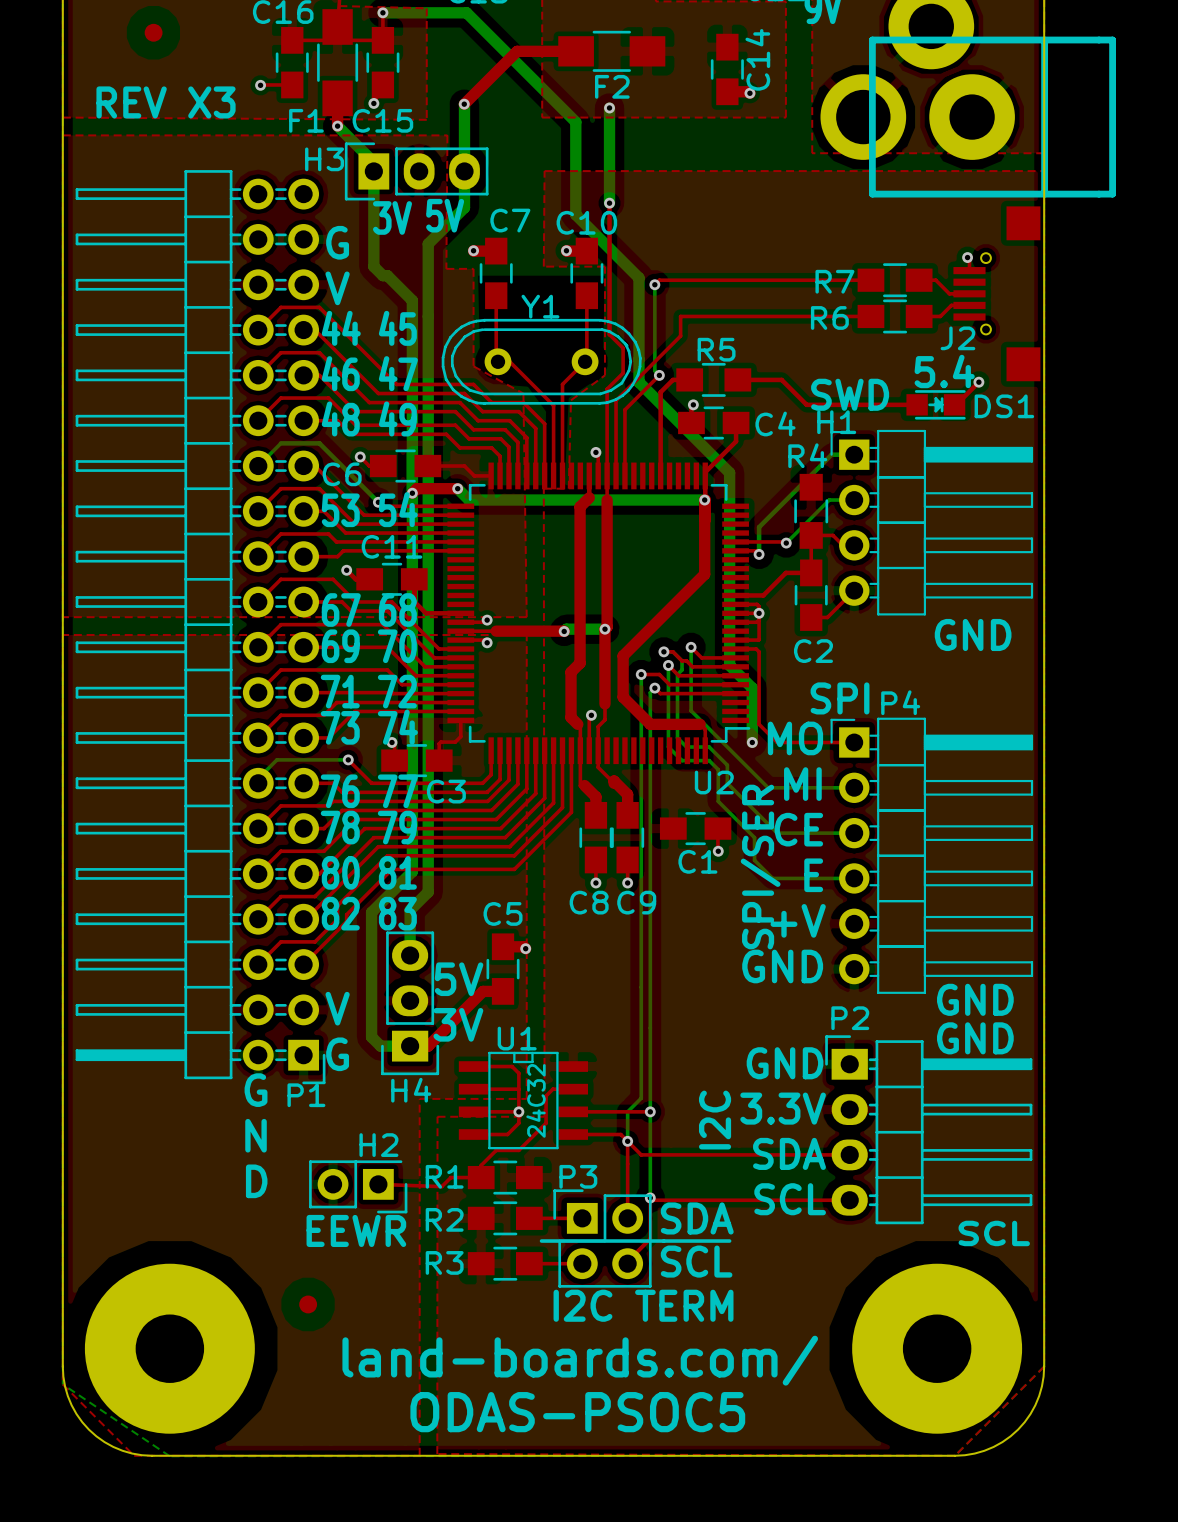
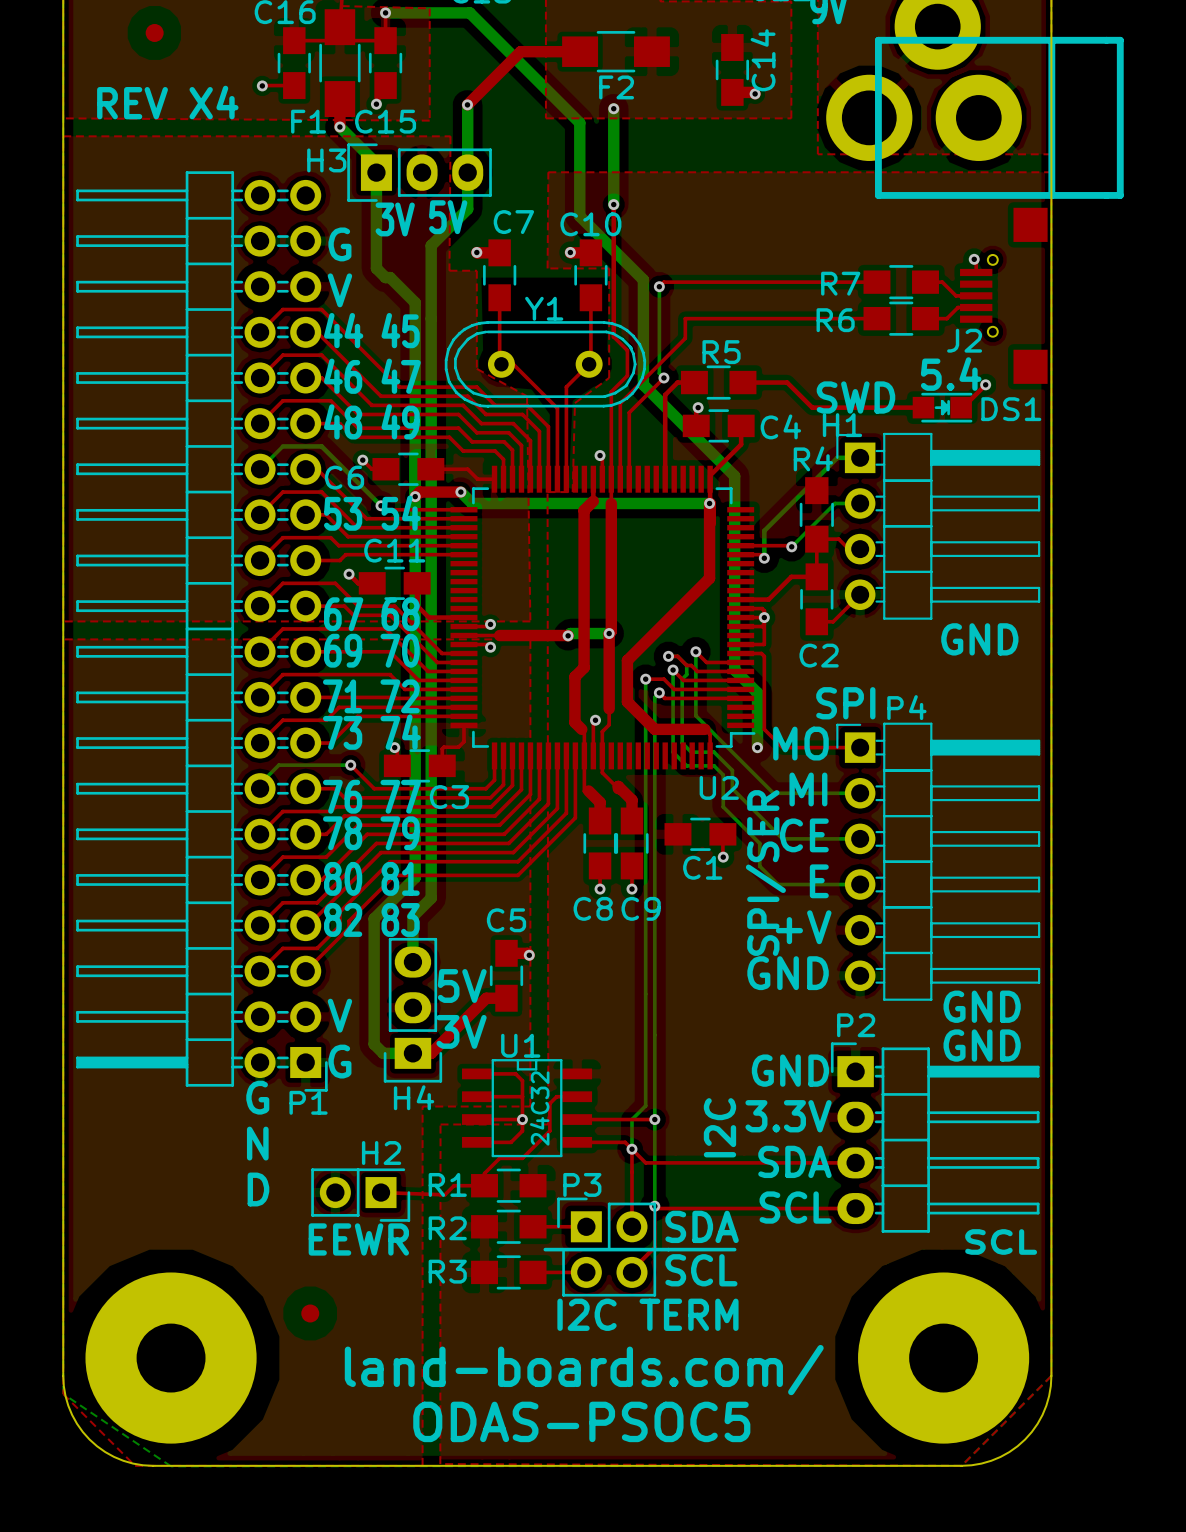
text: REV X3 (166, 102) -> REV X4 (167, 102)

